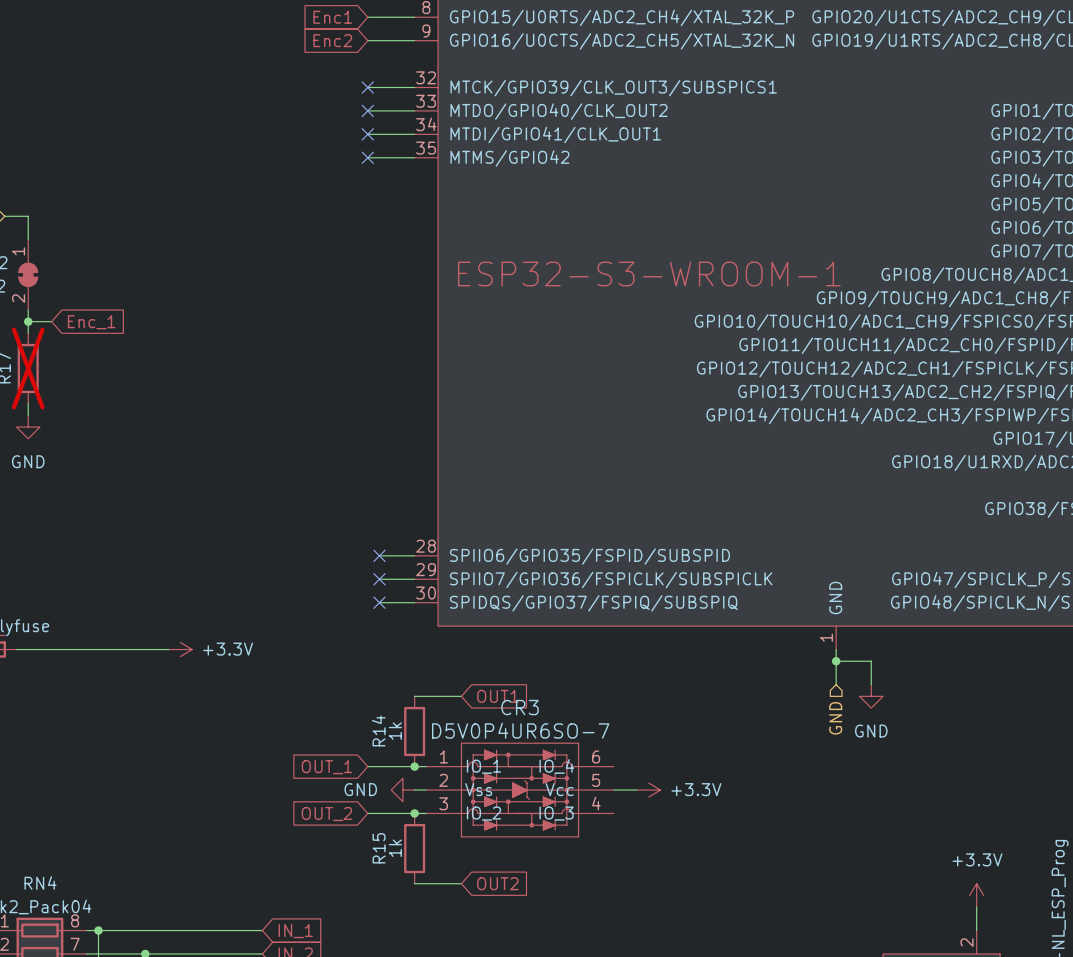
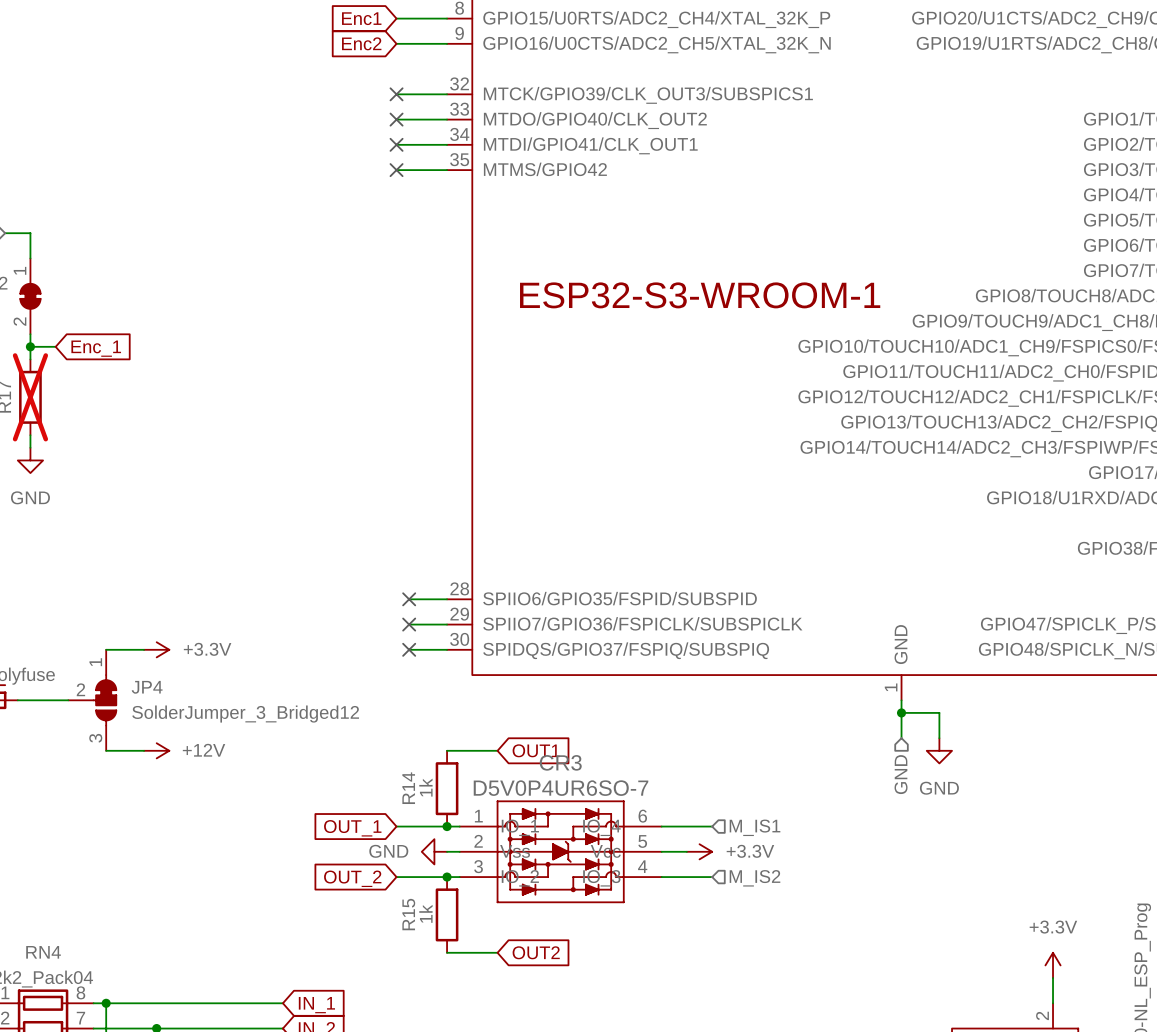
wire: none -> (106, 649) (144, 649)
wire: (63, 649) (168, 649) -> none
JP4: none -> SolderJumper_3_Bridged12 (92, 700)
power symbol position: +3.3V (180, 649) -> +3.3V (156, 649)
wire: none -> (106, 750) (144, 750)
power symbol: none -> +12V (156, 750)
CR3 symbol: [426, 742, 614, 838] -> [459, 800, 662, 903]
wire: none -> (661, 826) (712, 826)
hierarchical label: none -> M_IS1 (755, 827)
wire: none -> (661, 877) (712, 877)
hierarchical label: none -> M_IS2 (755, 878)

